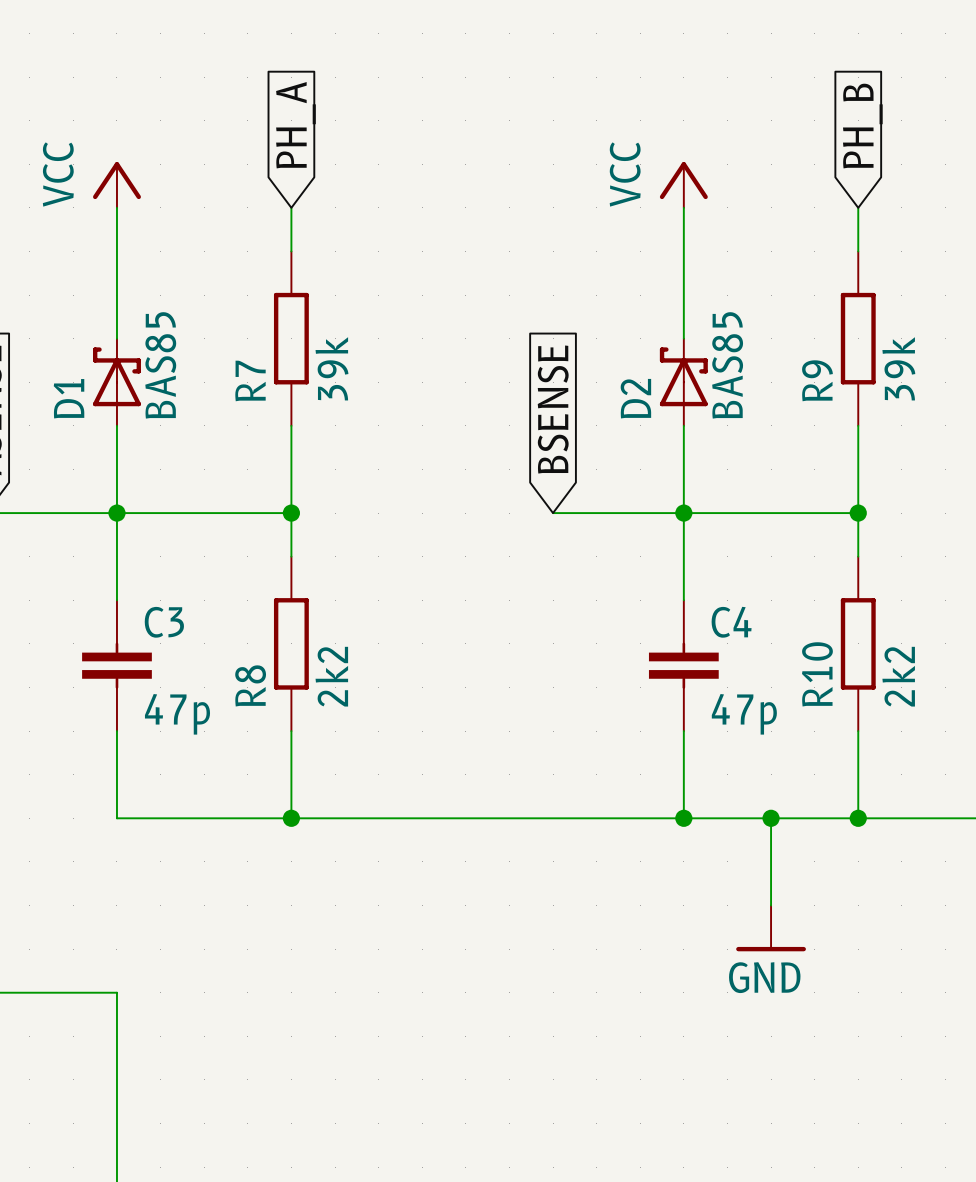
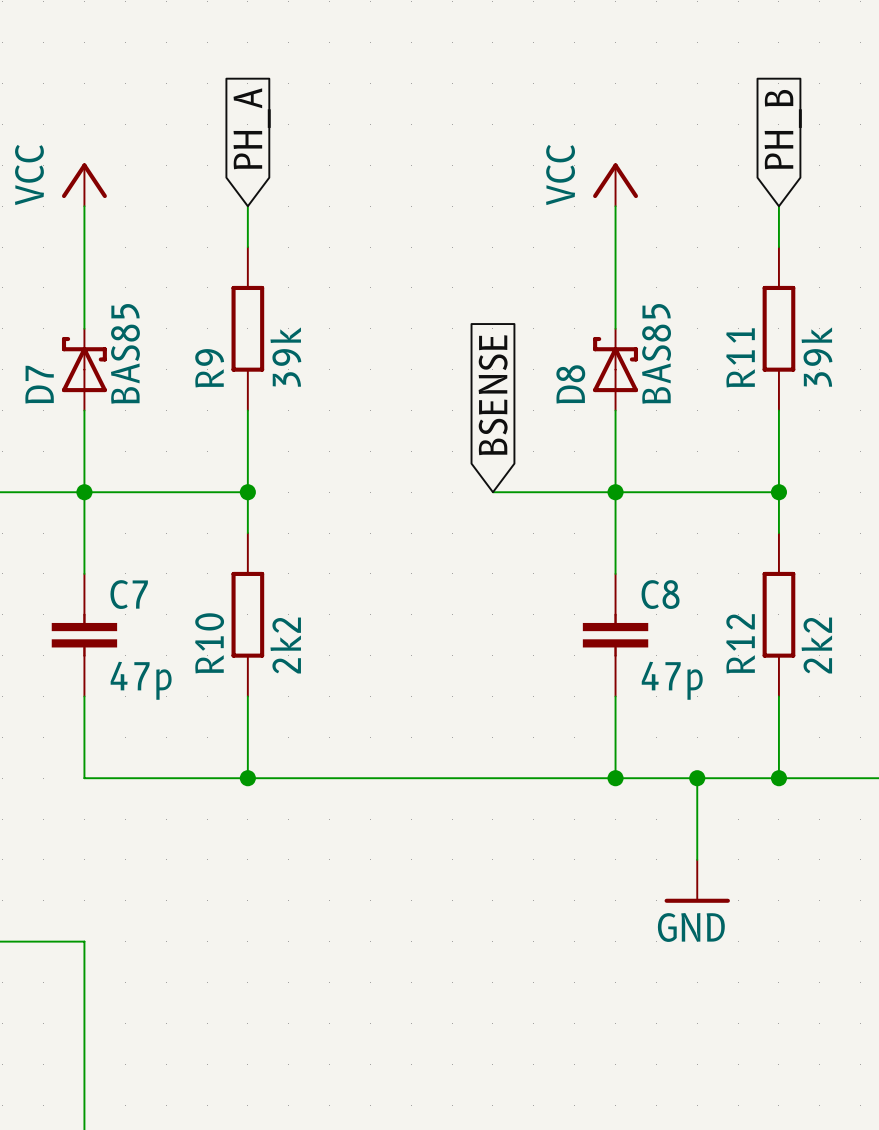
R7 name: R7 (250, 380) -> R9 (209, 368)
R9 name: R9 (817, 380) -> R11 (740, 357)
D1 name: D1 (69, 398) -> D7 (39, 384)
D2 name: D2 (635, 398) -> D8 (570, 384)
C3 name: C3 (164, 622) -> C7 (129, 594)
C4 name: C4 (731, 622) -> C8 (660, 594)
R10 name: R10 (817, 674) -> R12 (740, 643)
R8 name: R8 (250, 685) -> R10 (209, 643)

